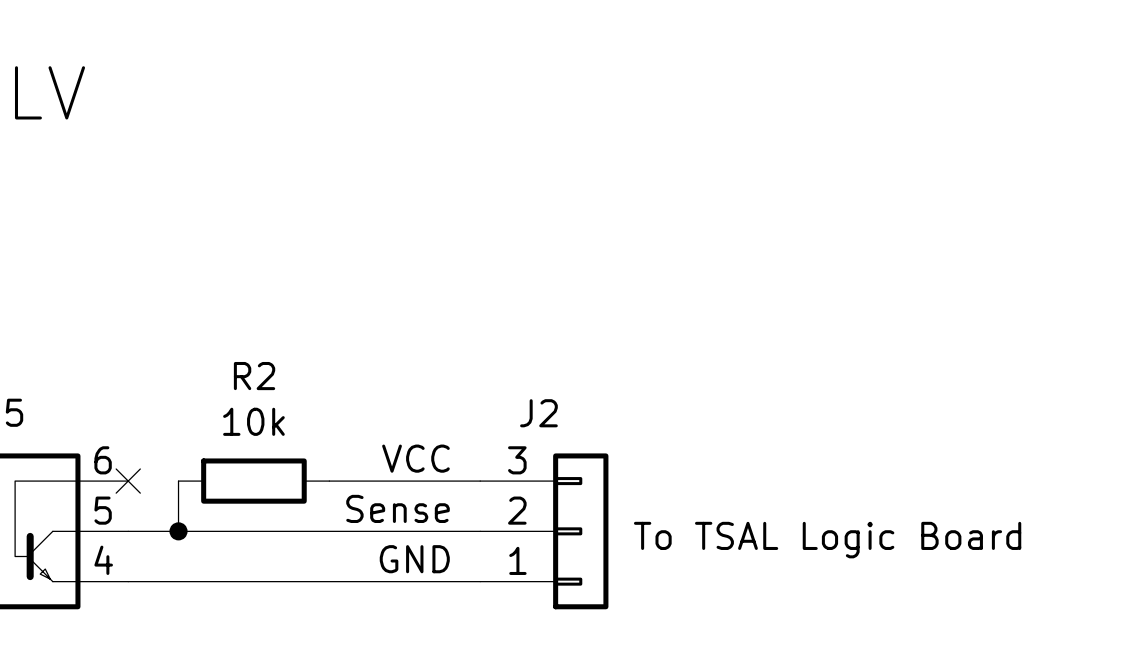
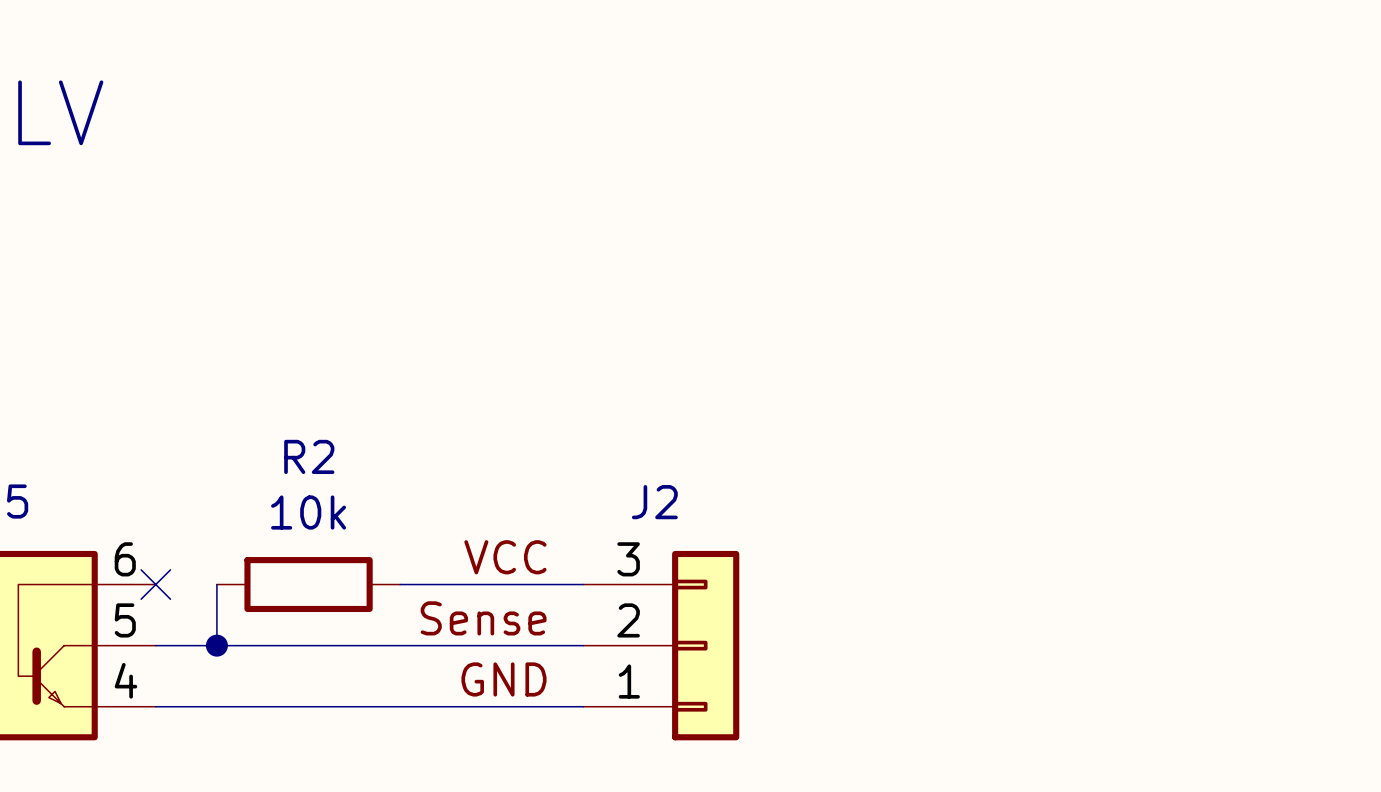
text: To TSAL Logic Board (827, 540) -> none

